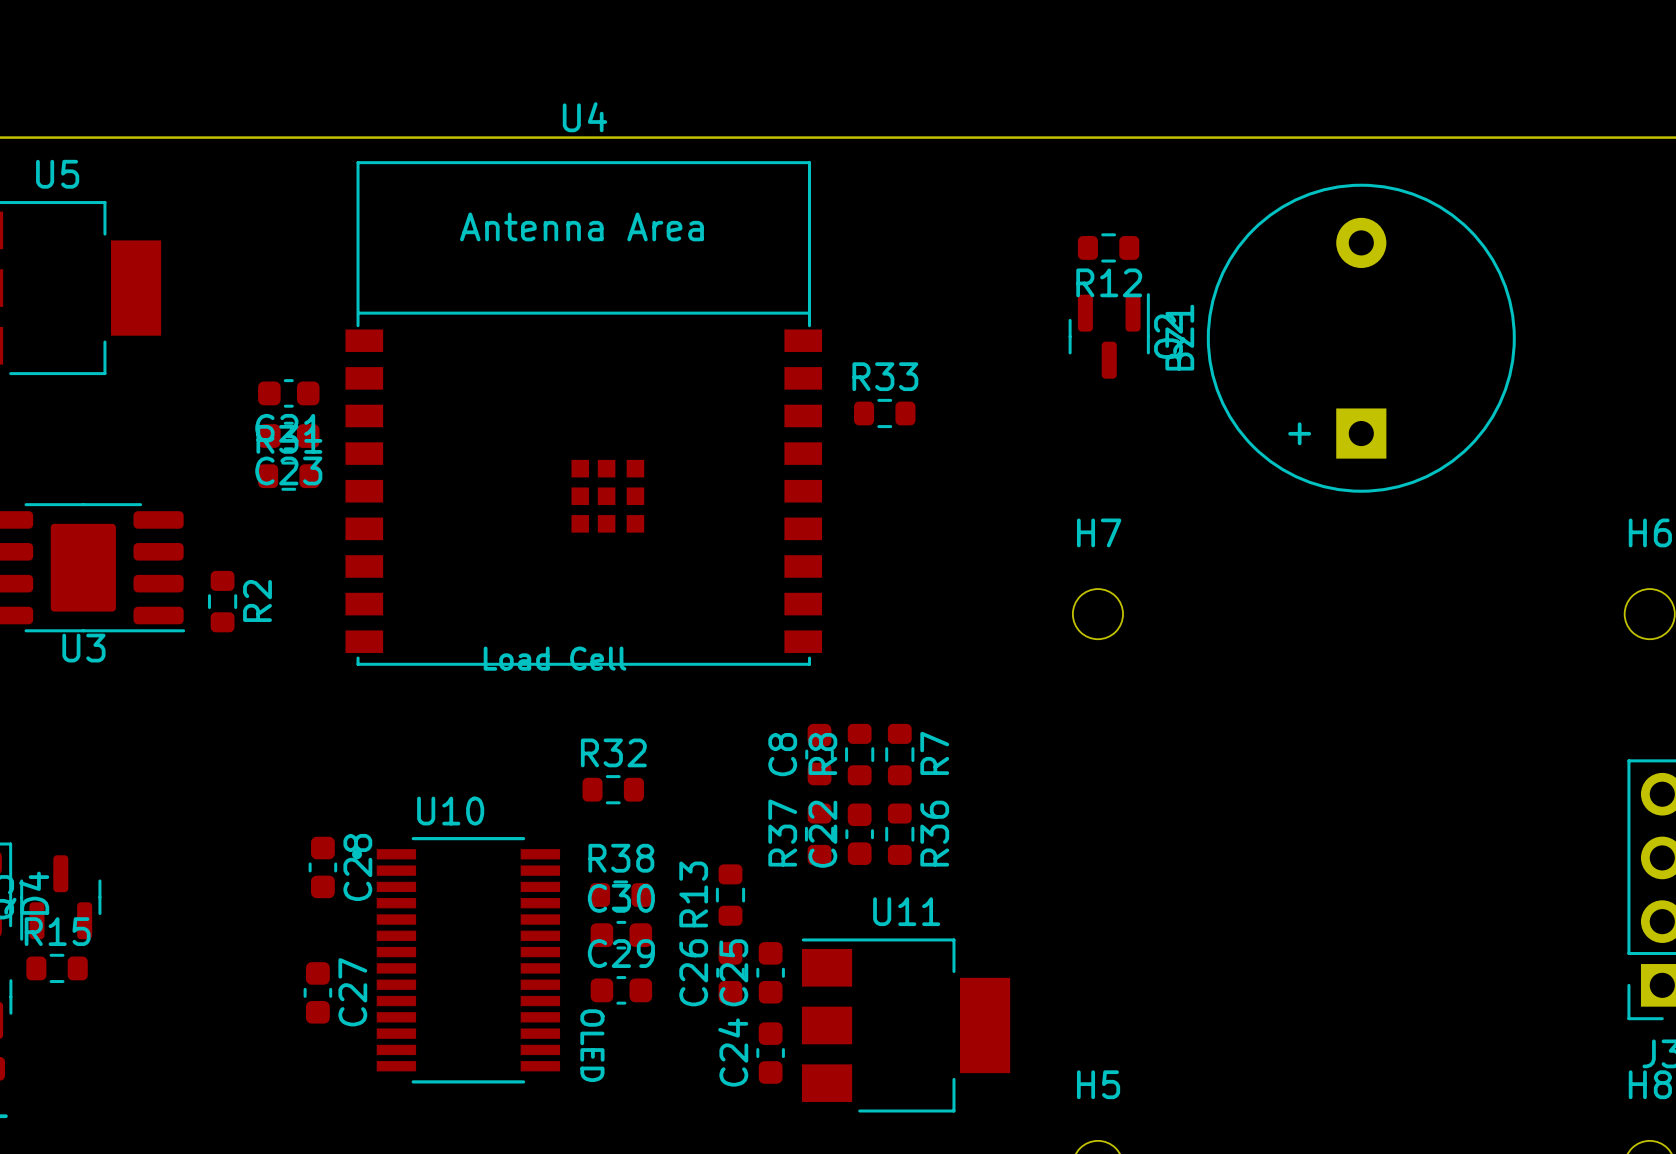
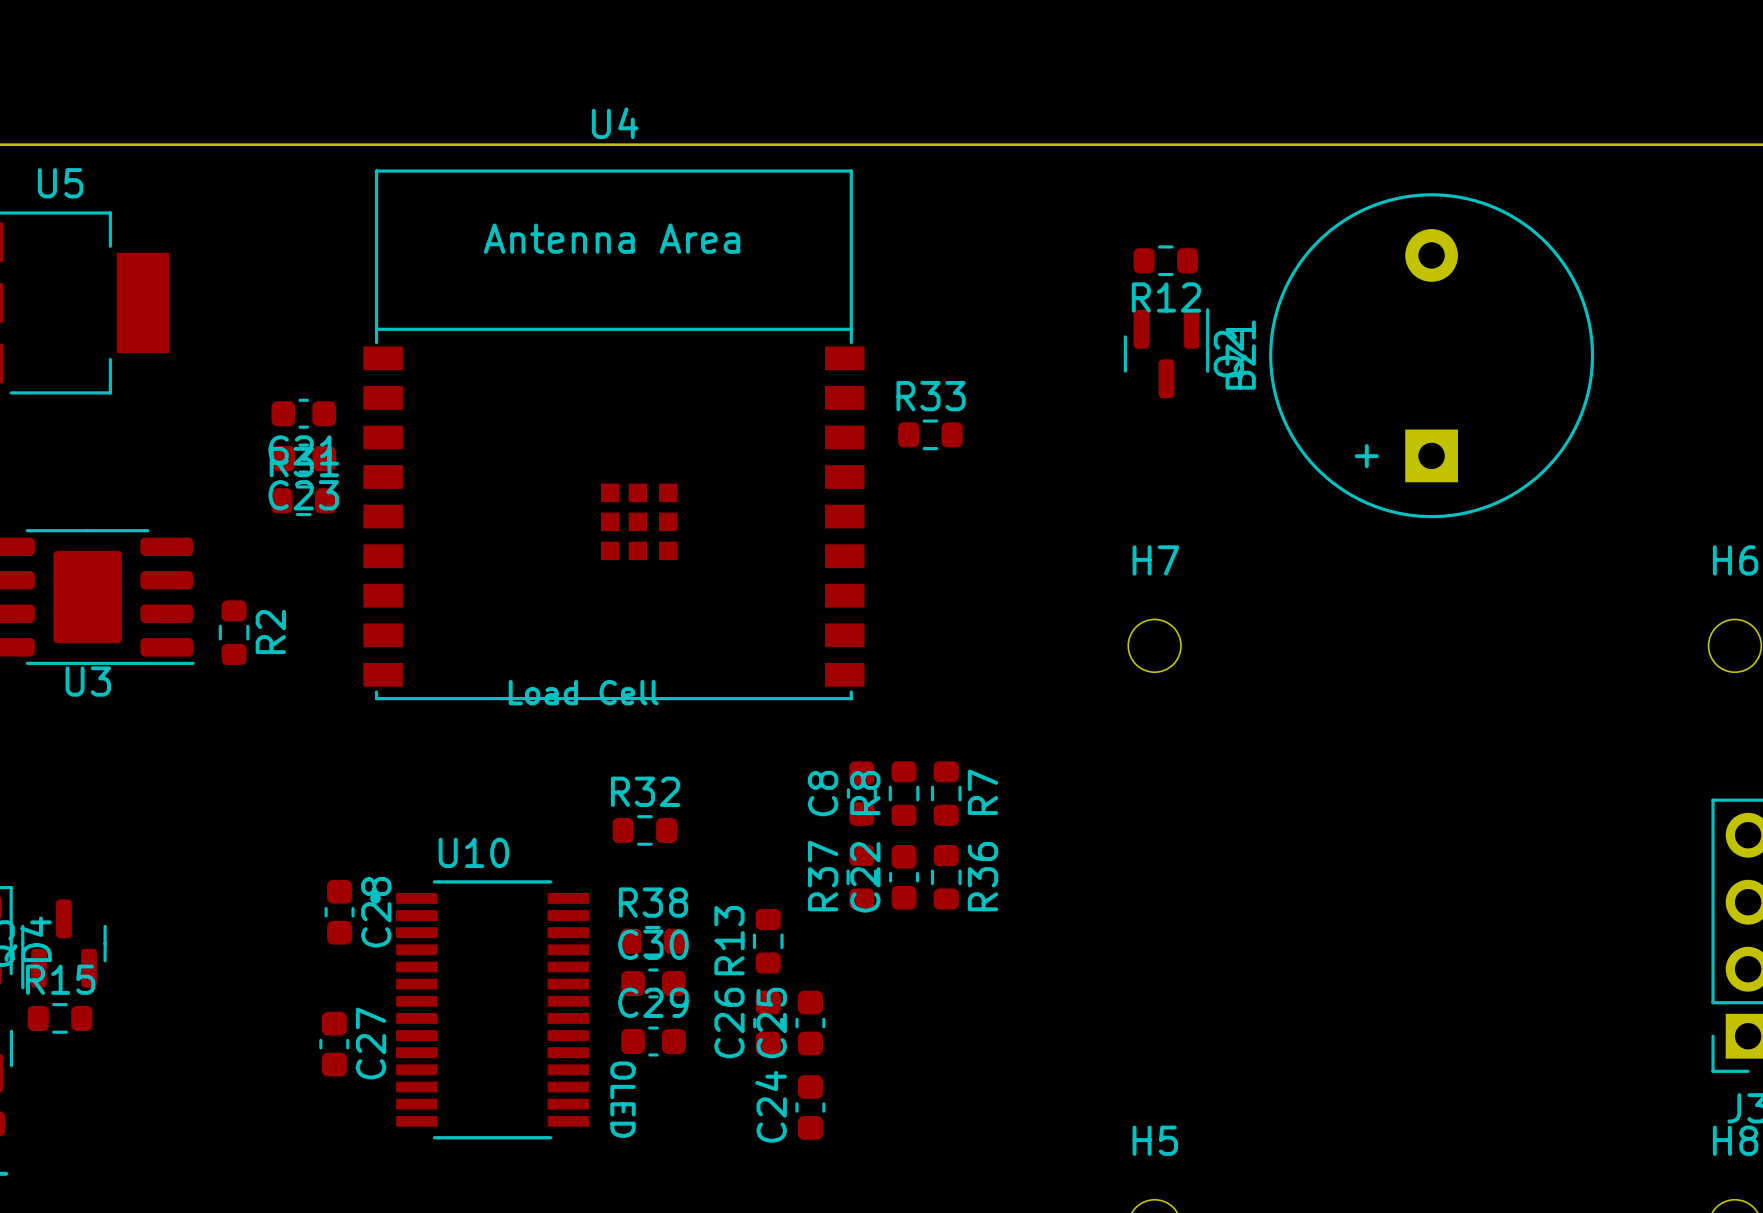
U11: (905, 1025) -> none

